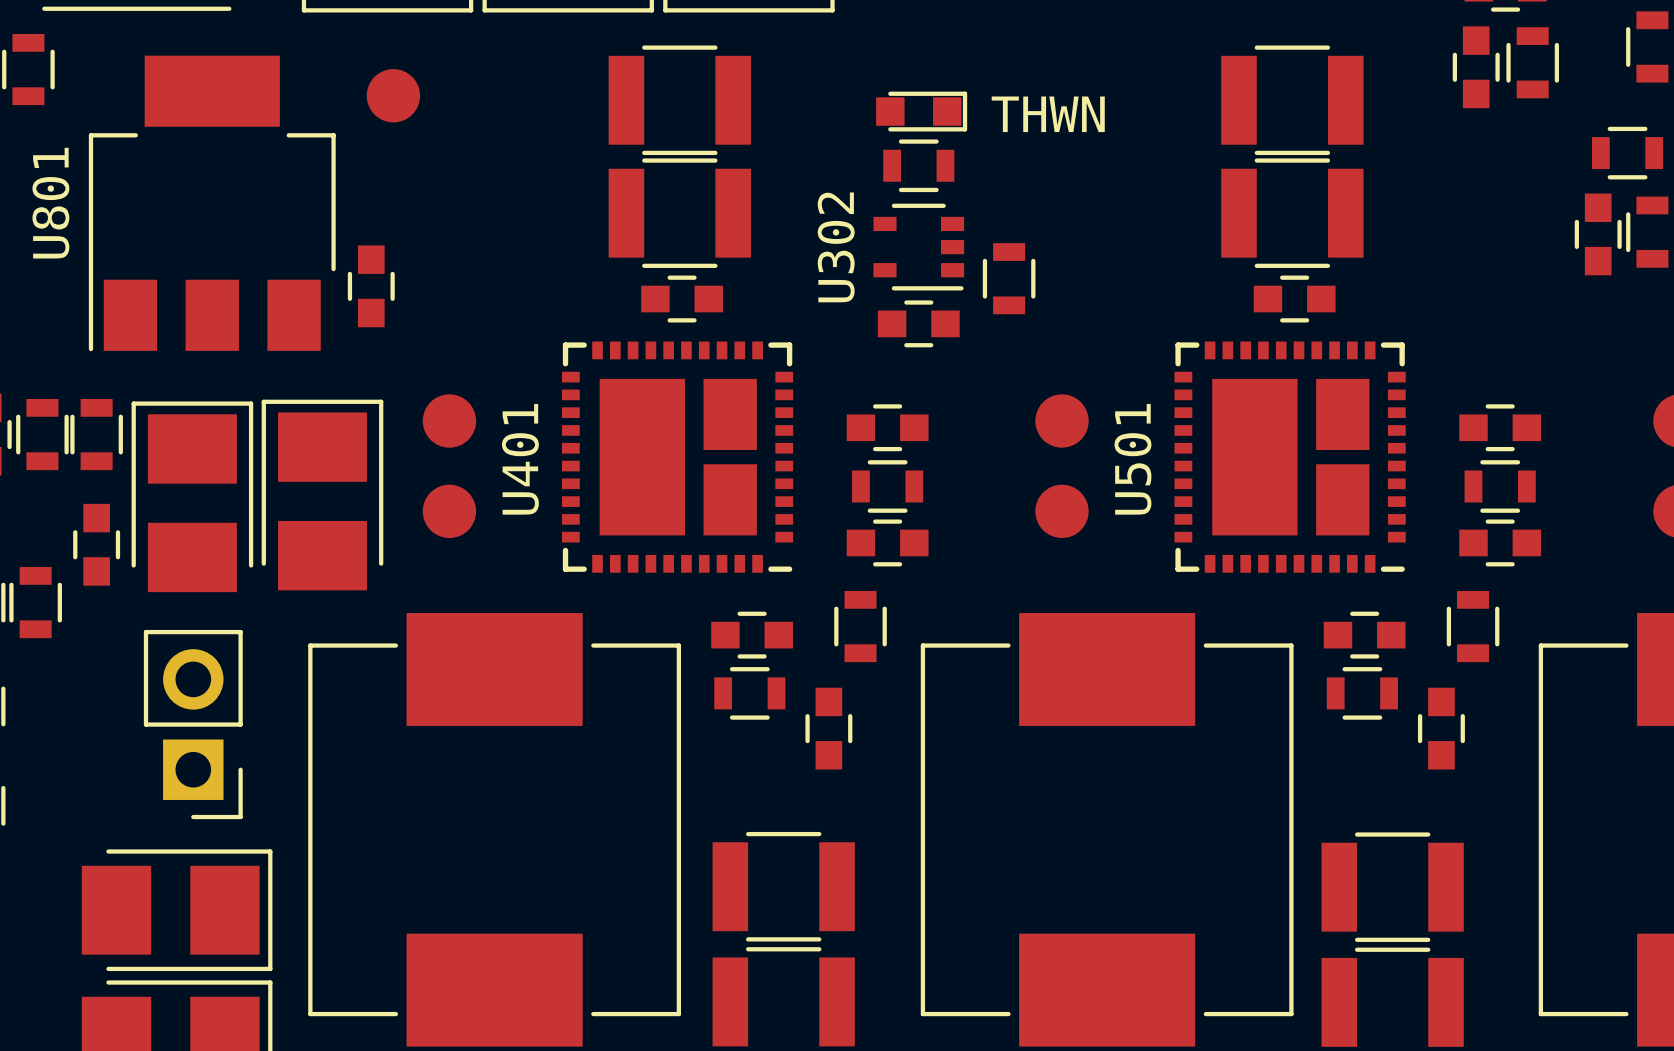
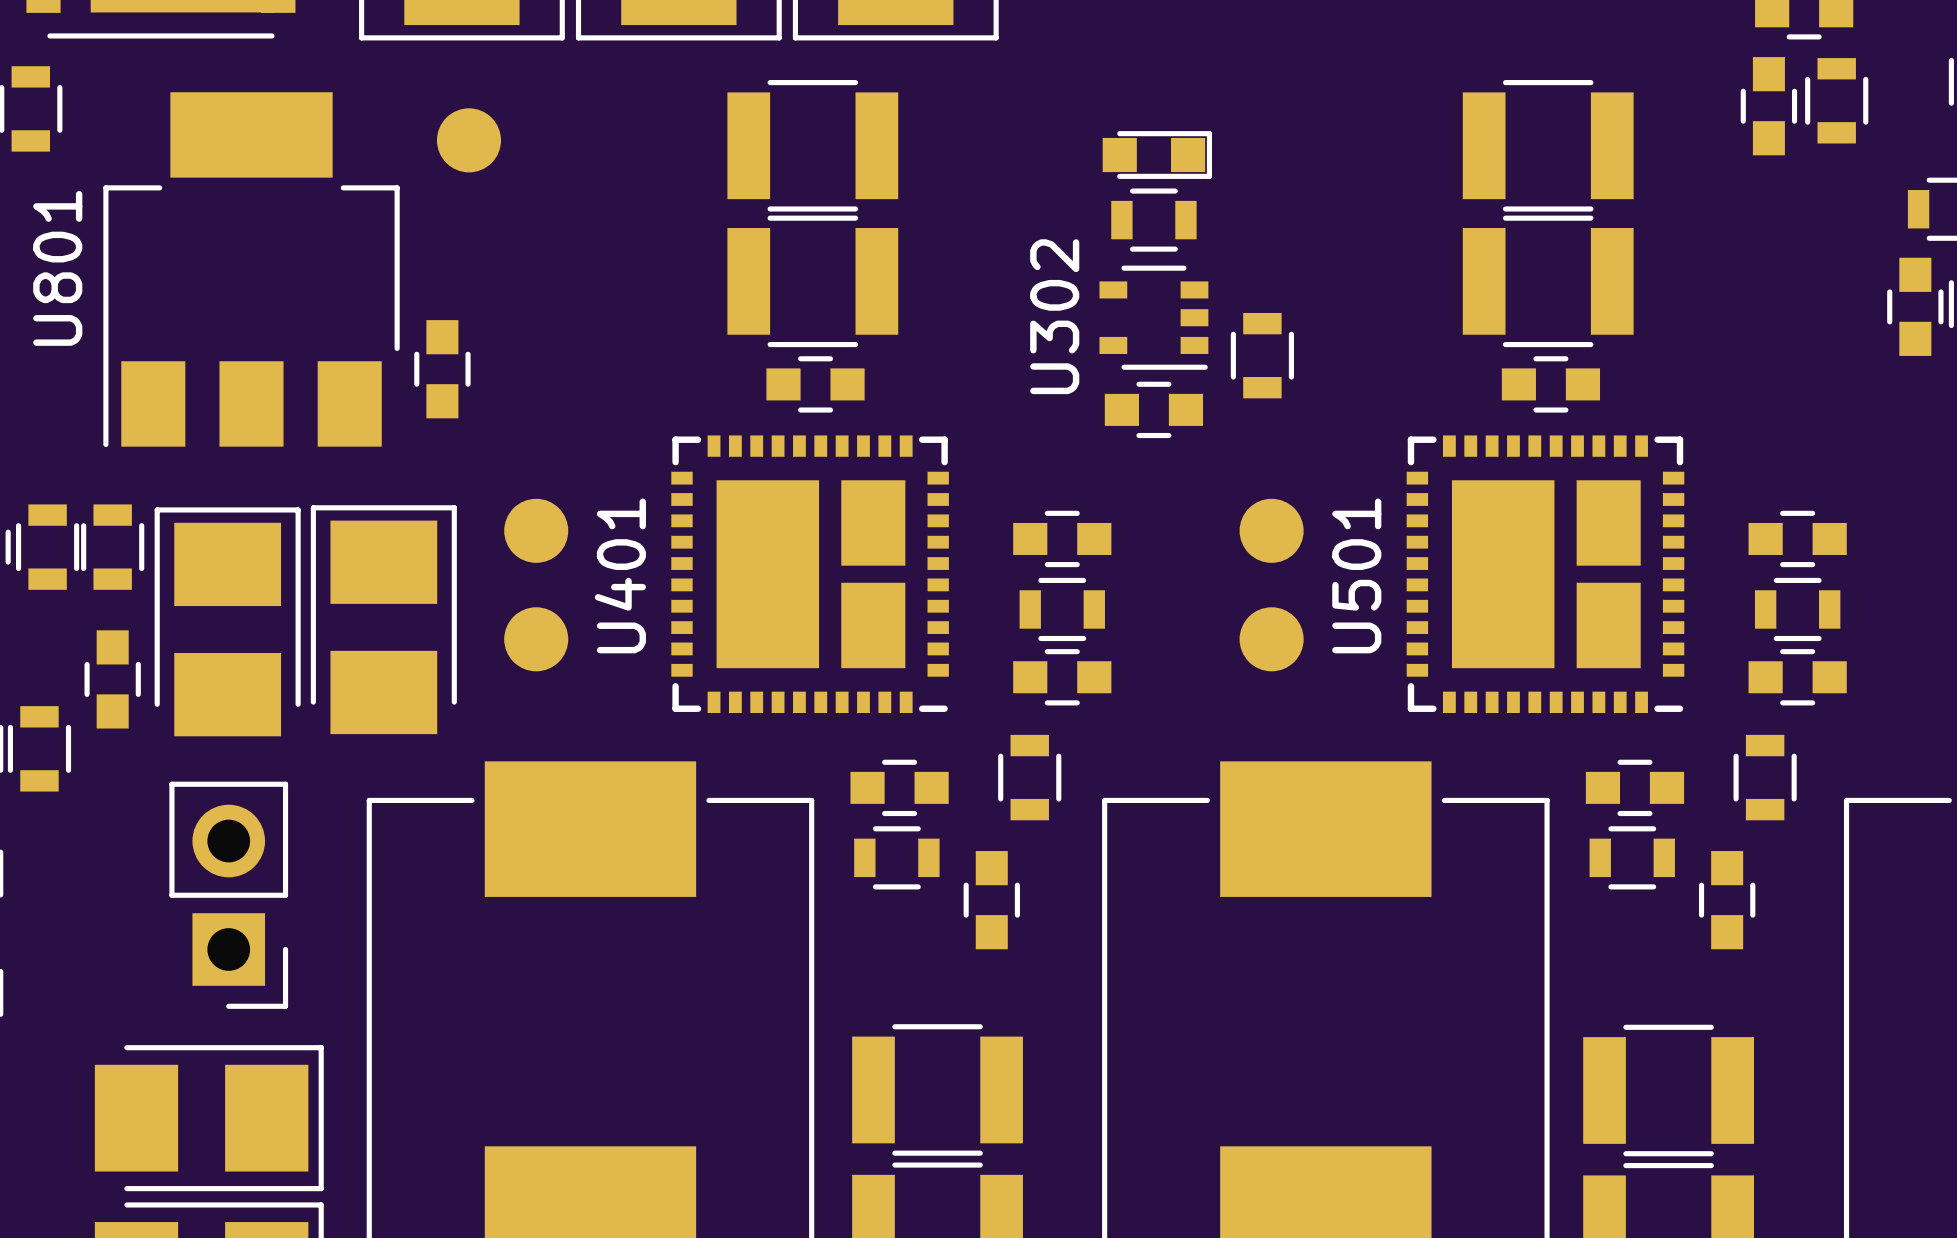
part position: (921, 111) -> (1157, 155)
text: THWN (1048, 114) -> none
part position: (918, 165) -> (1153, 220)
U302 position: (918, 247) -> (1153, 317)
part position: (1009, 278) -> (1262, 355)
part position: (918, 323) -> (1153, 409)

